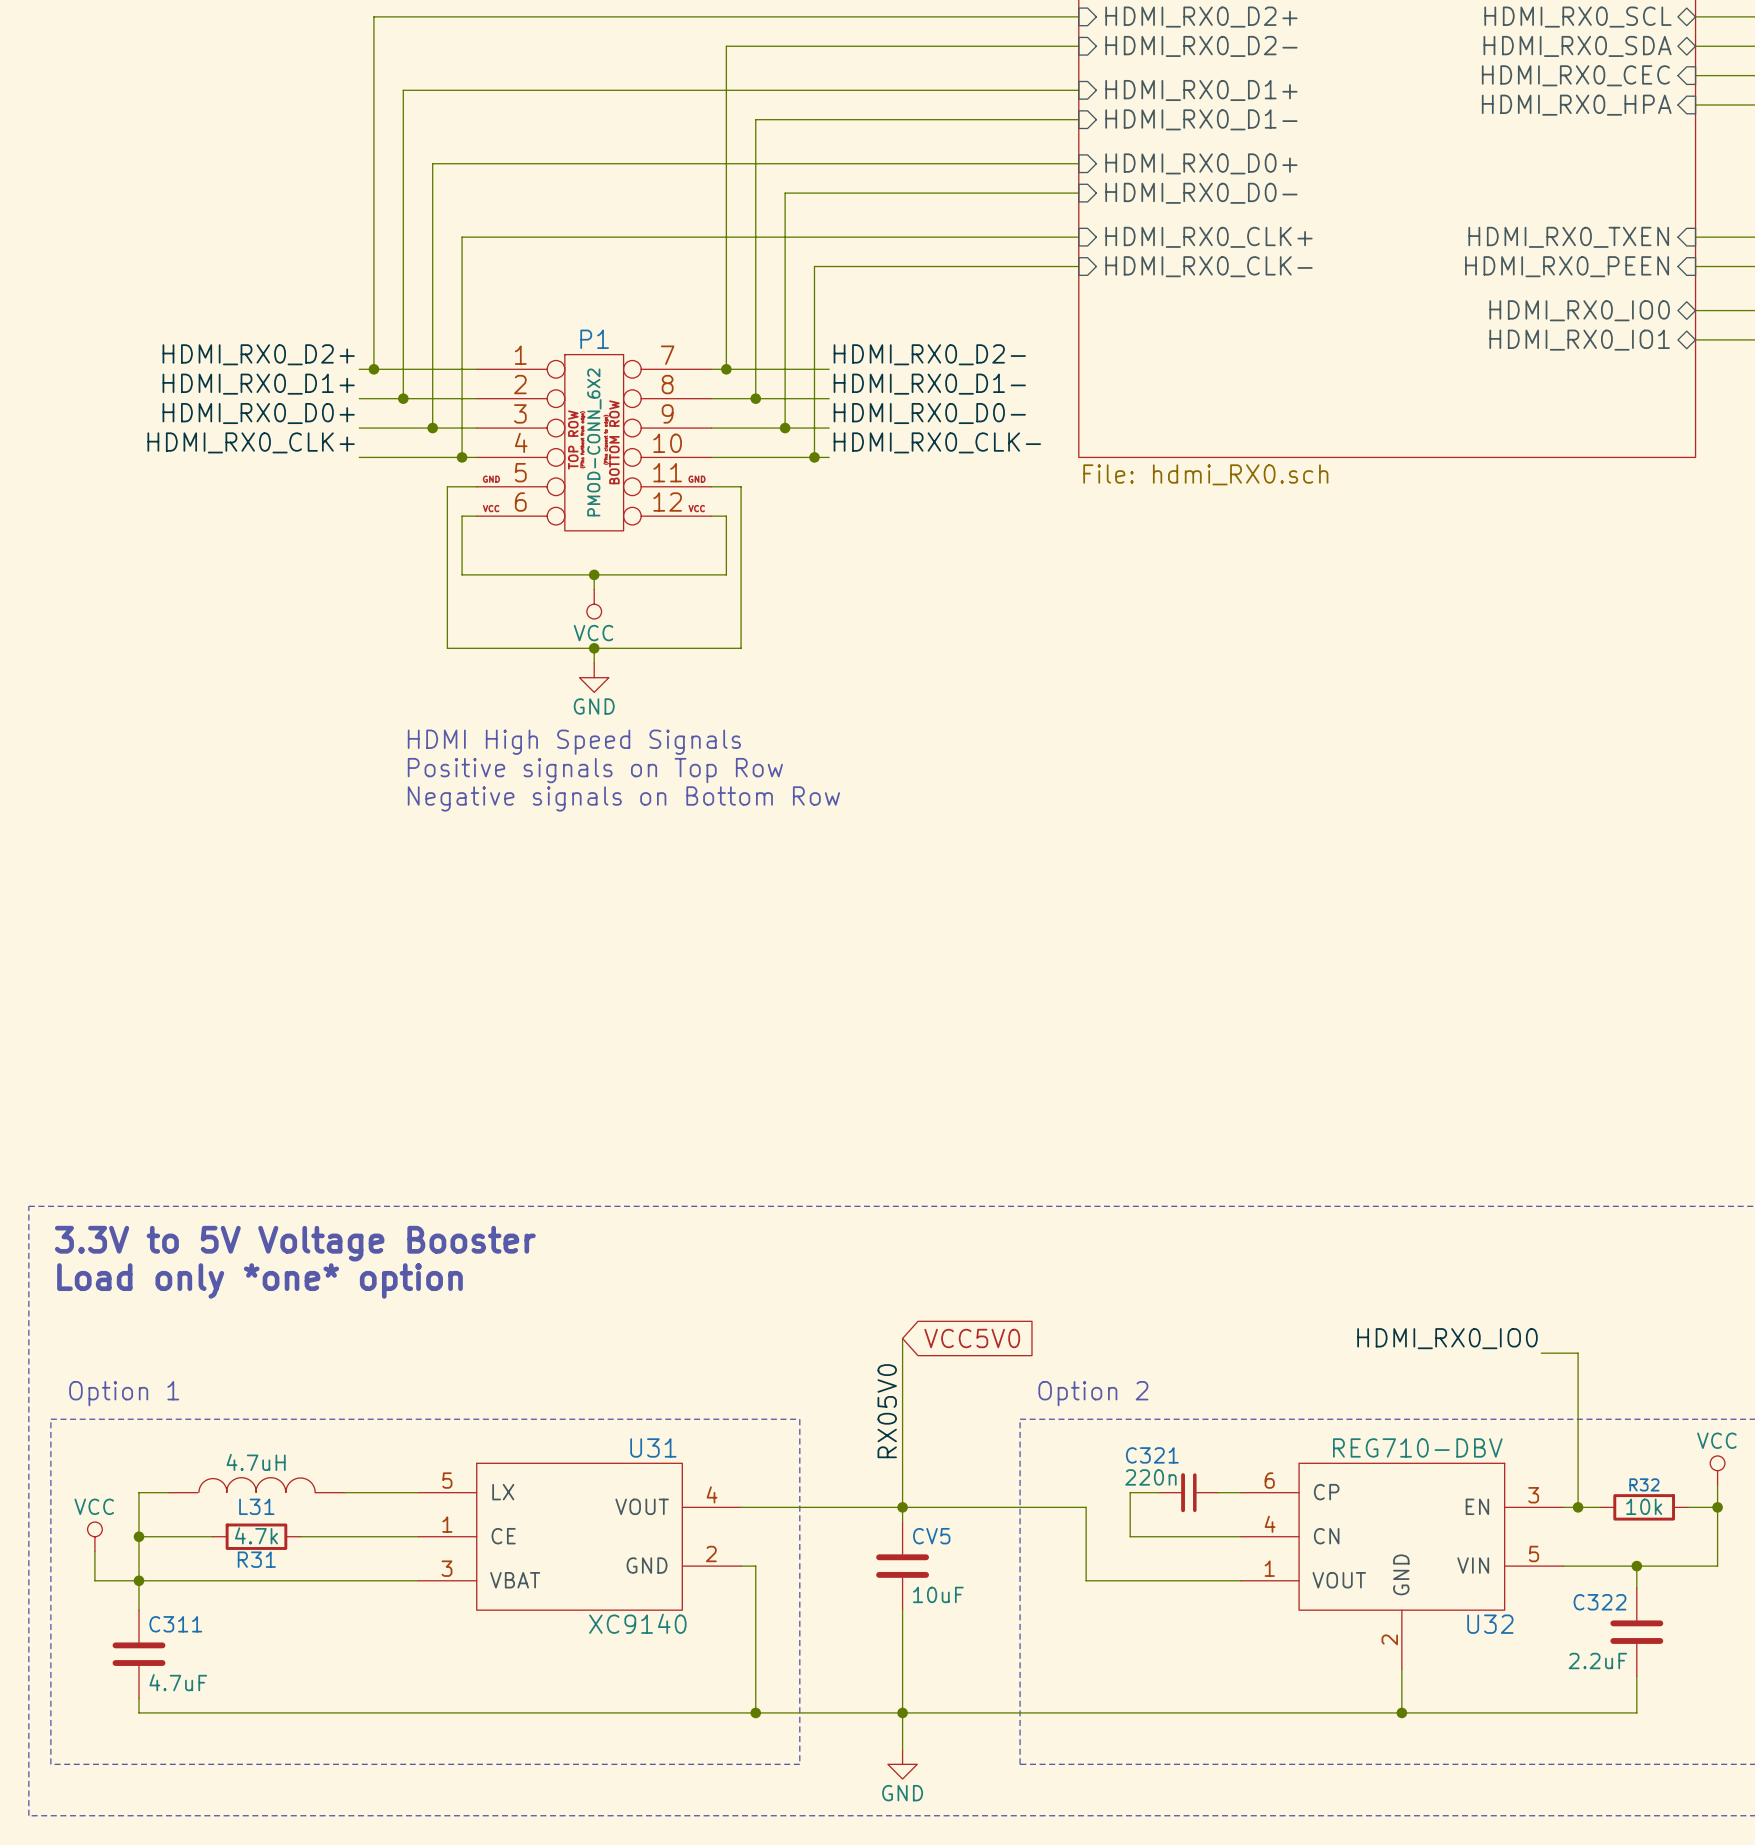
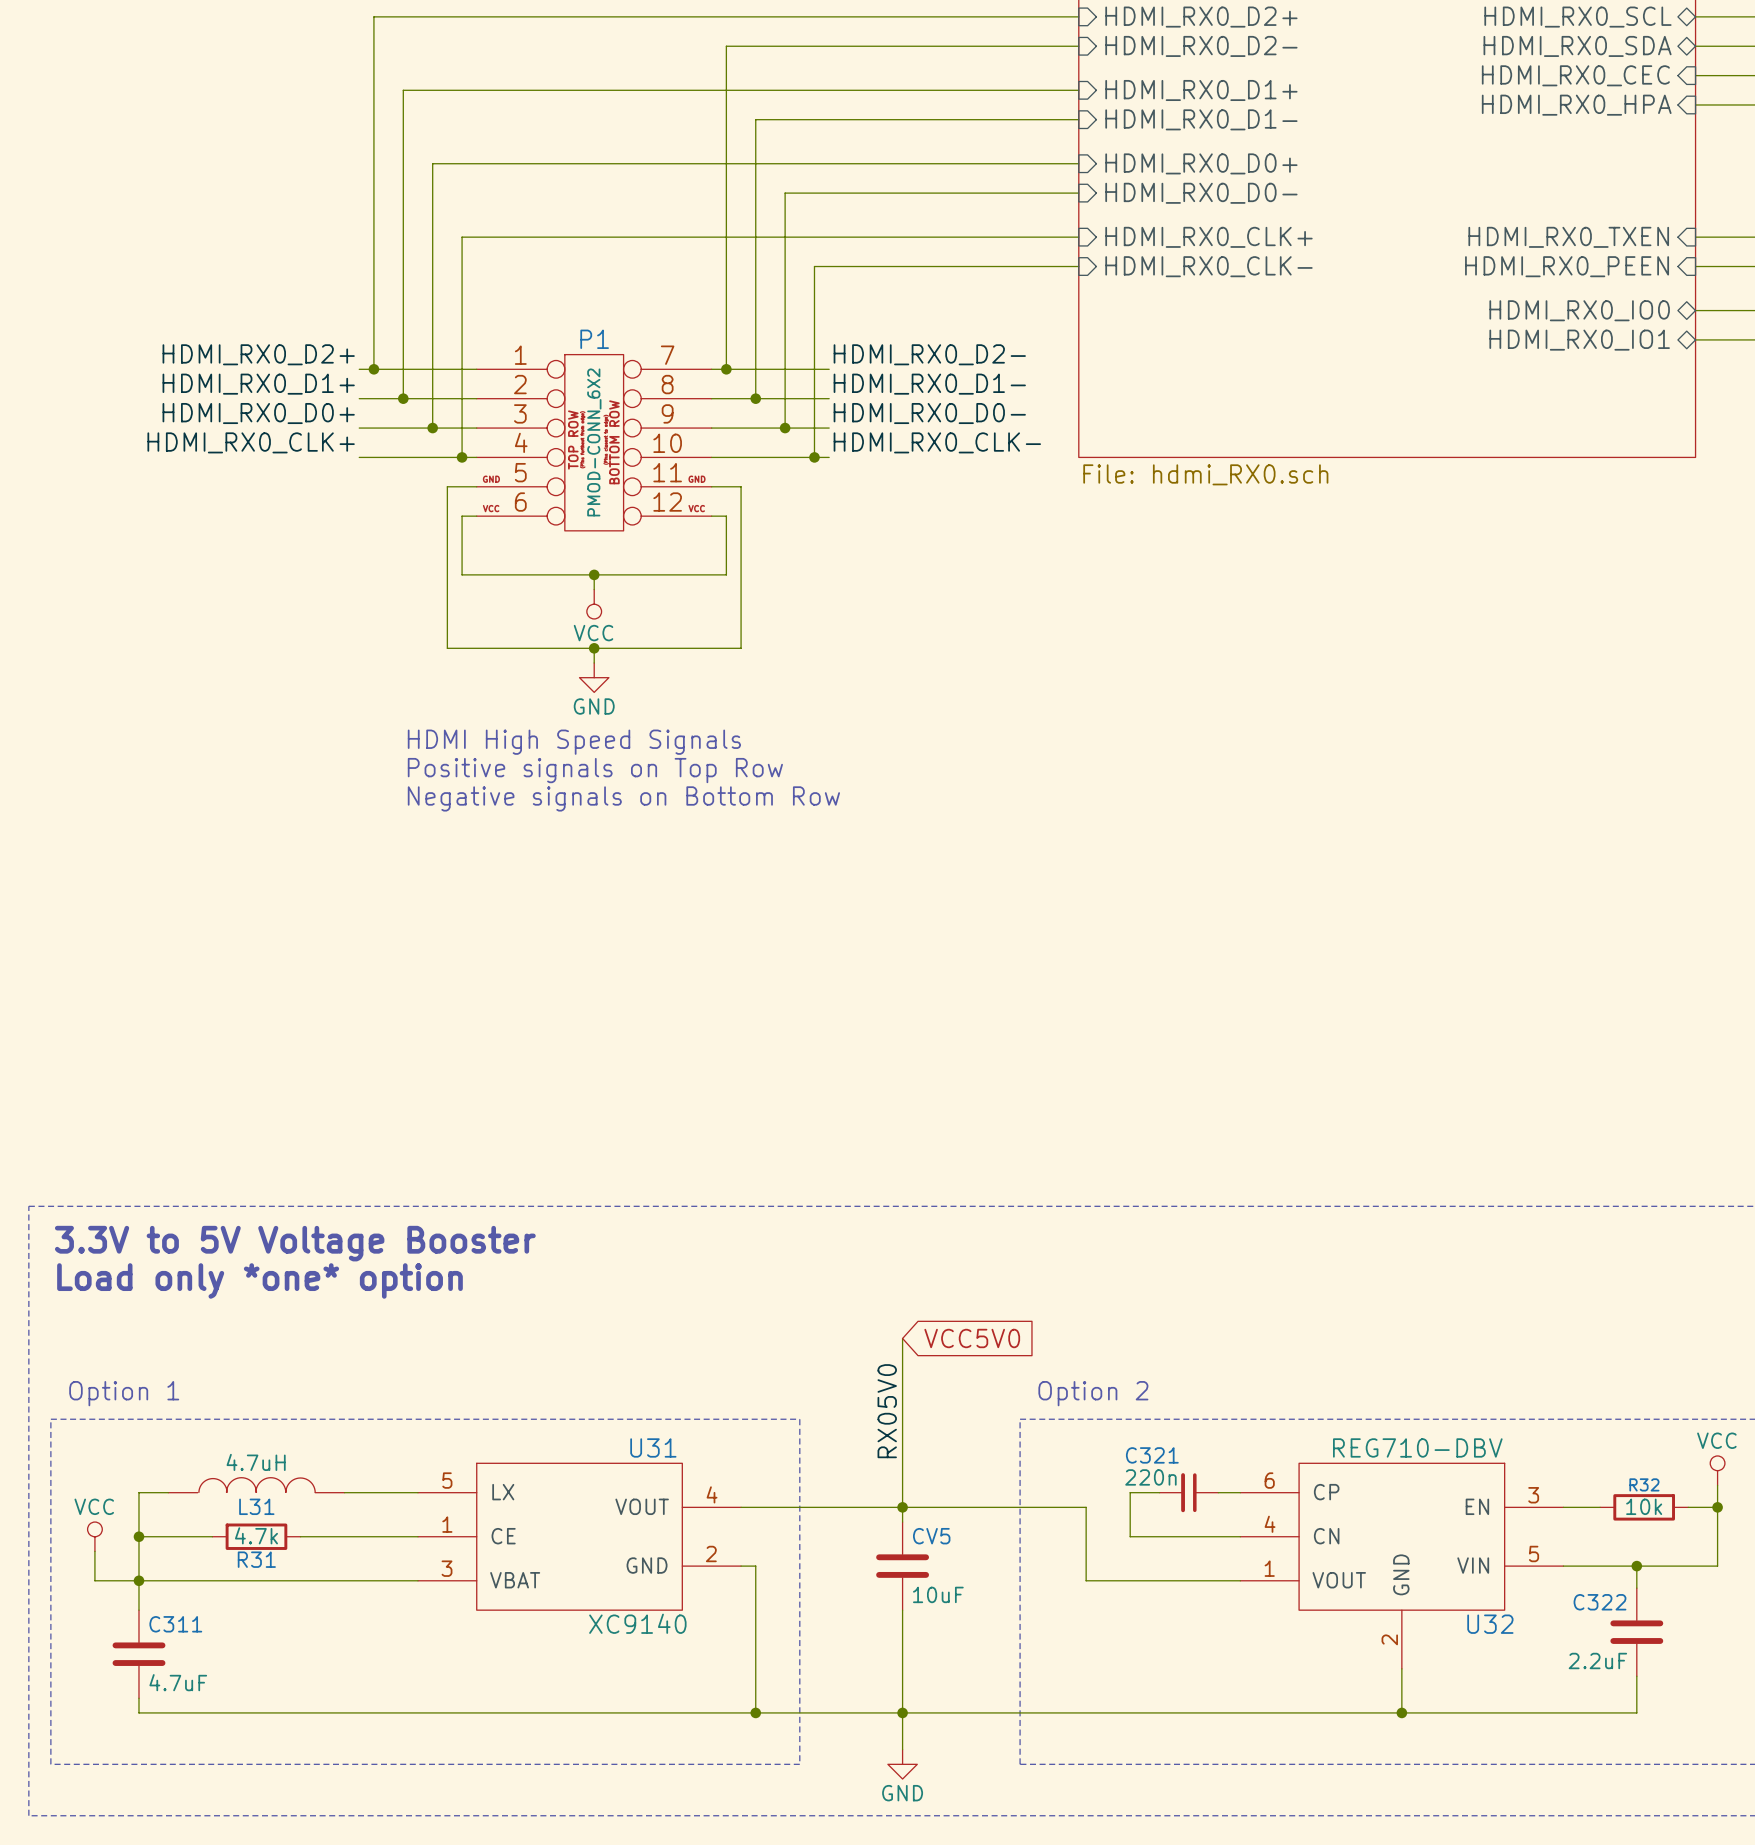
label: HDMI_RX0_IO0 (1447, 1338) -> none
wire: (1541, 1353) (1578, 1353) (1578, 1507) -> none
junction: (1578, 1507) -> none

